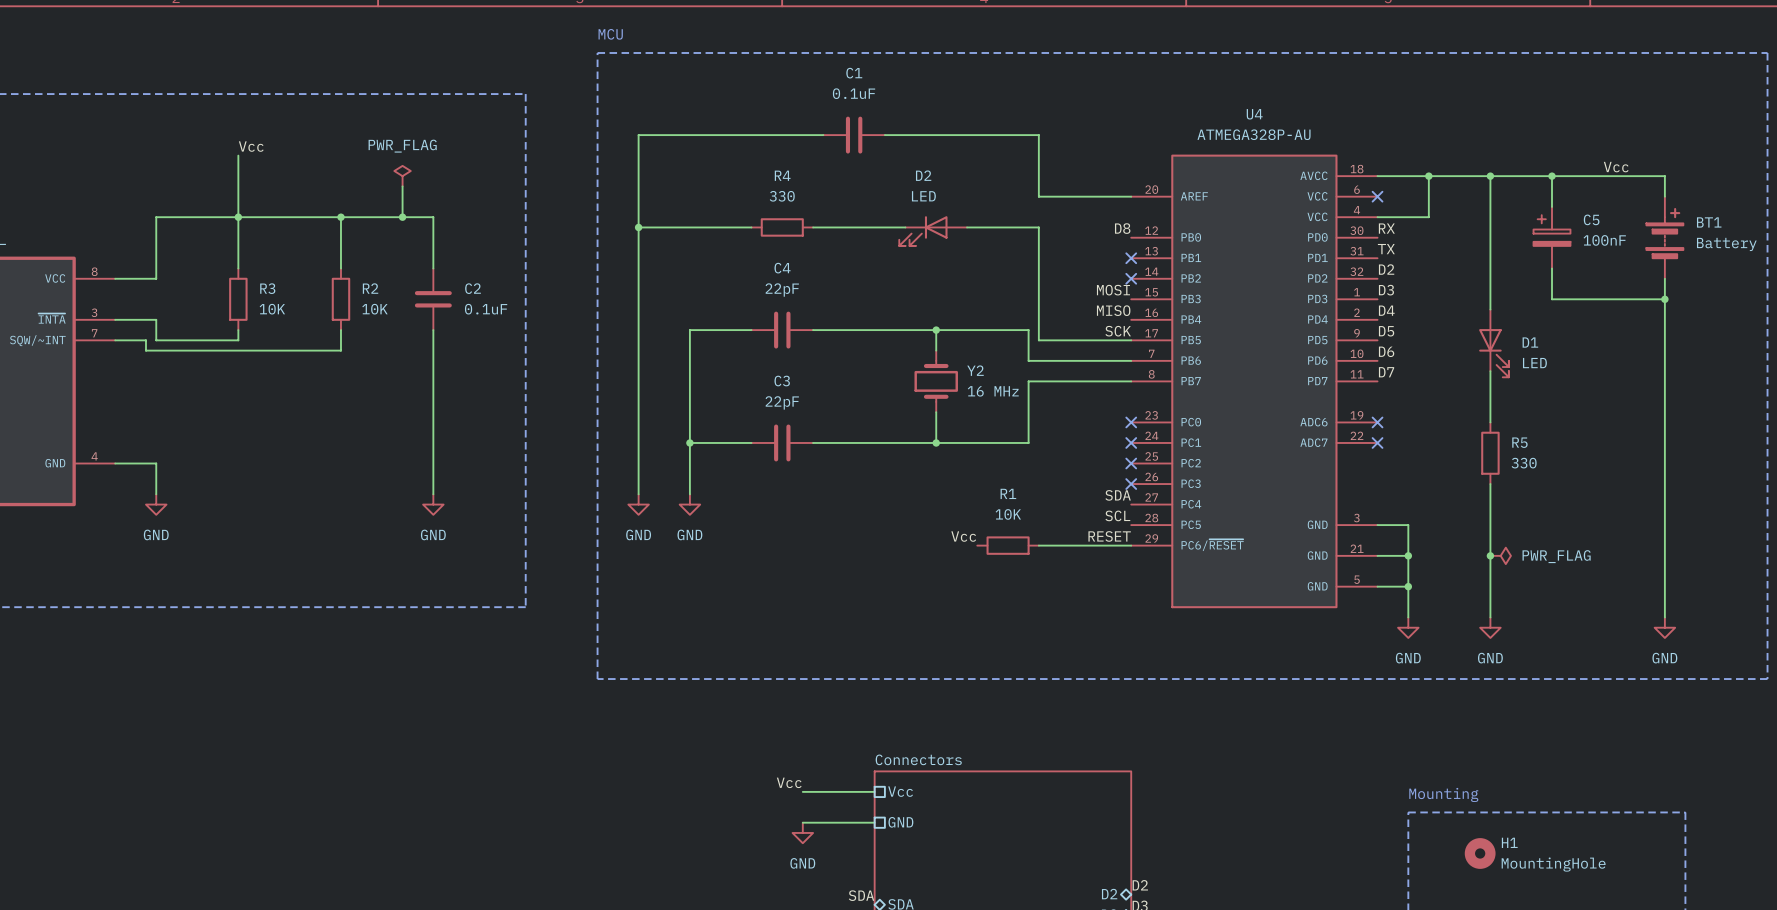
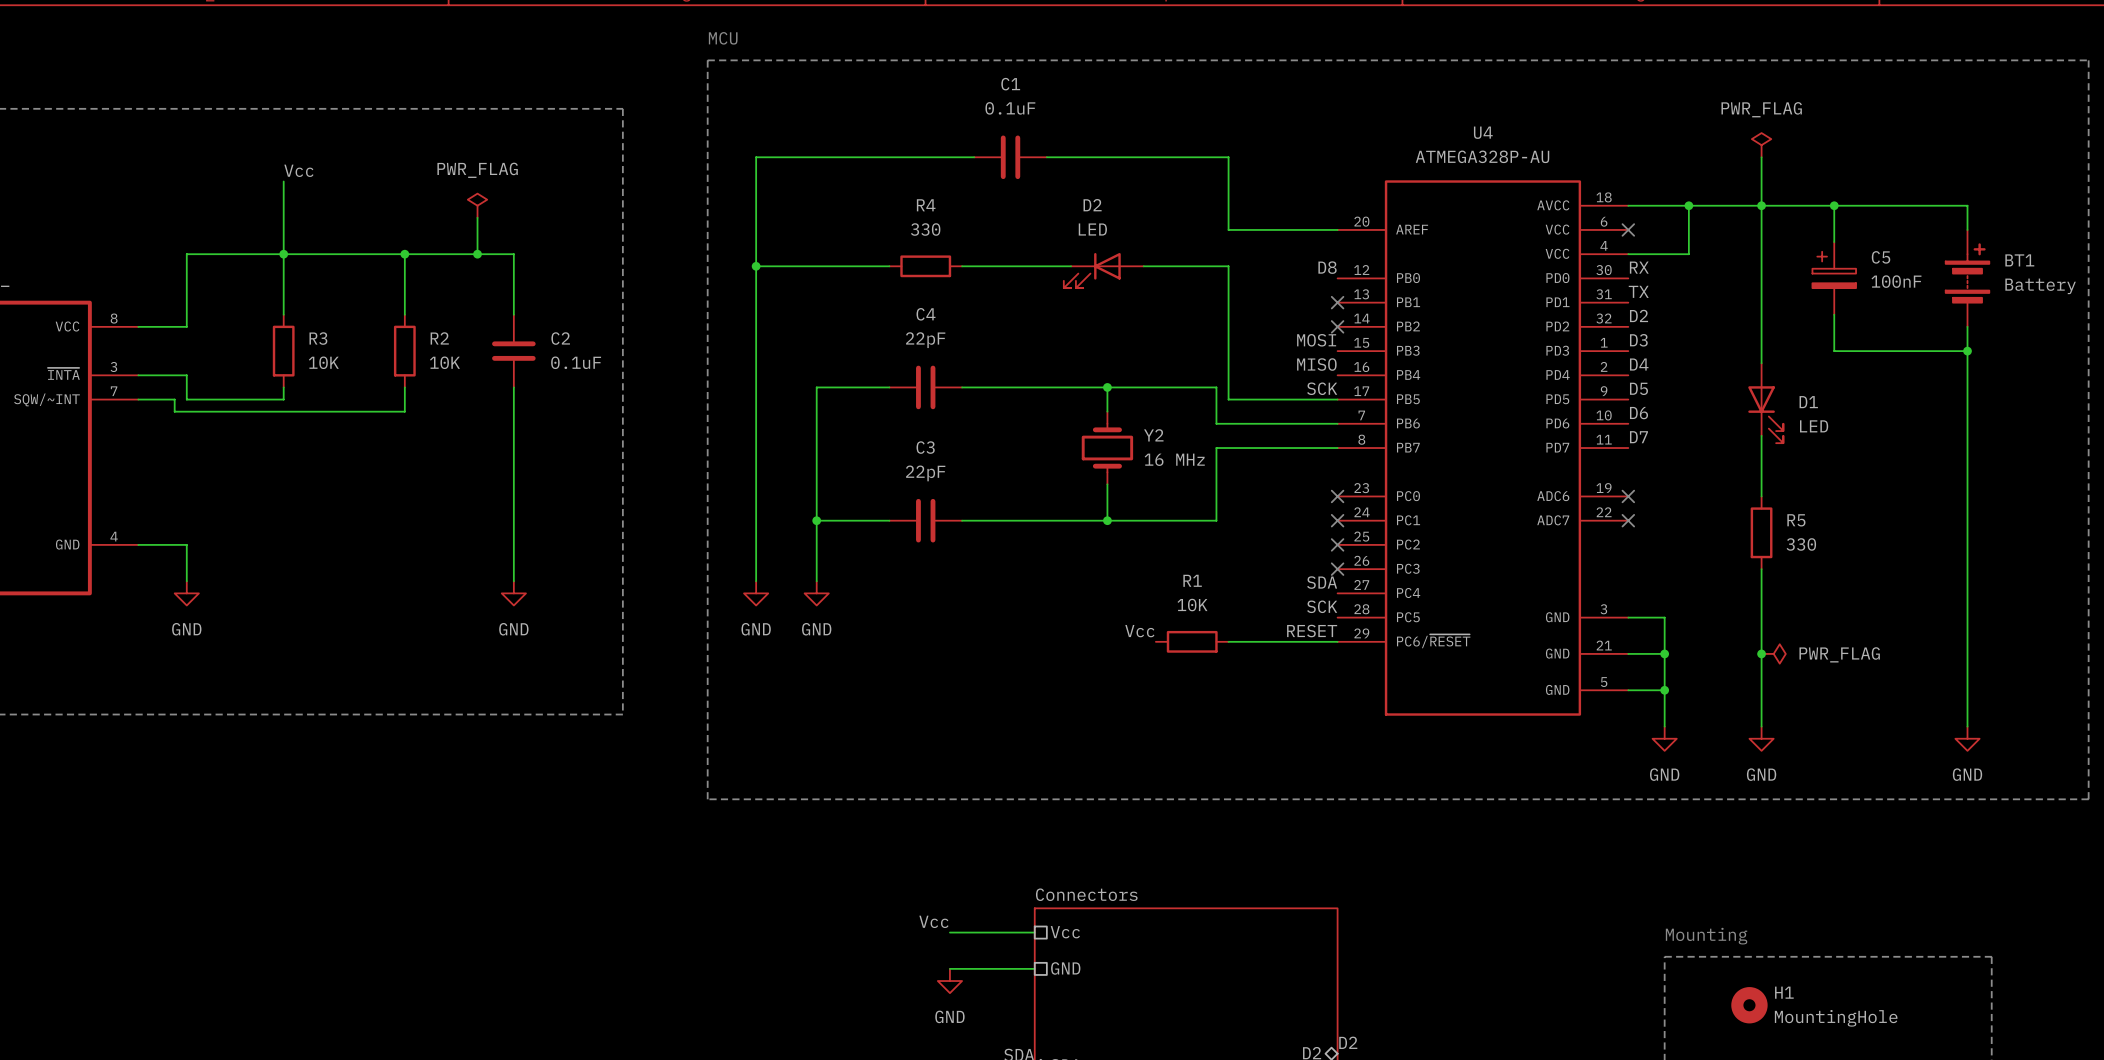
power symbol: none -> PWR_FLAG (1761, 145)
wire: none -> (1761, 157) (1761, 205)
label: Vcc (1616, 167) -> none
label: SCL (1117, 515) -> SCK (1322, 606)

